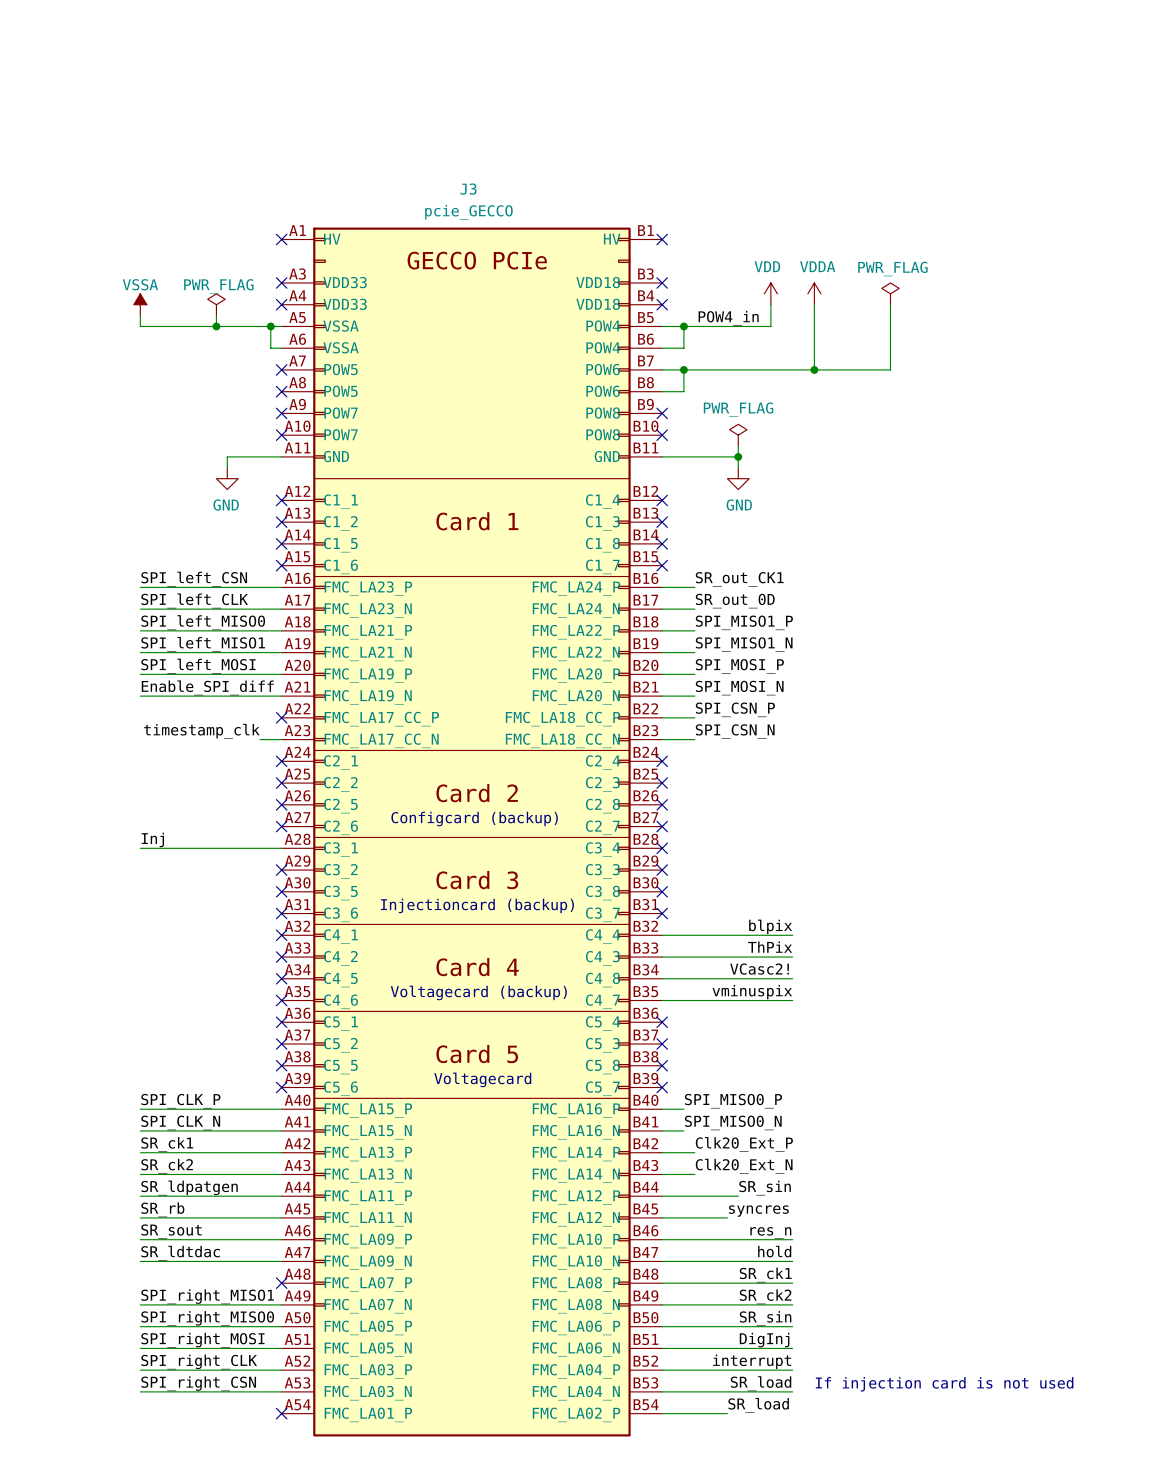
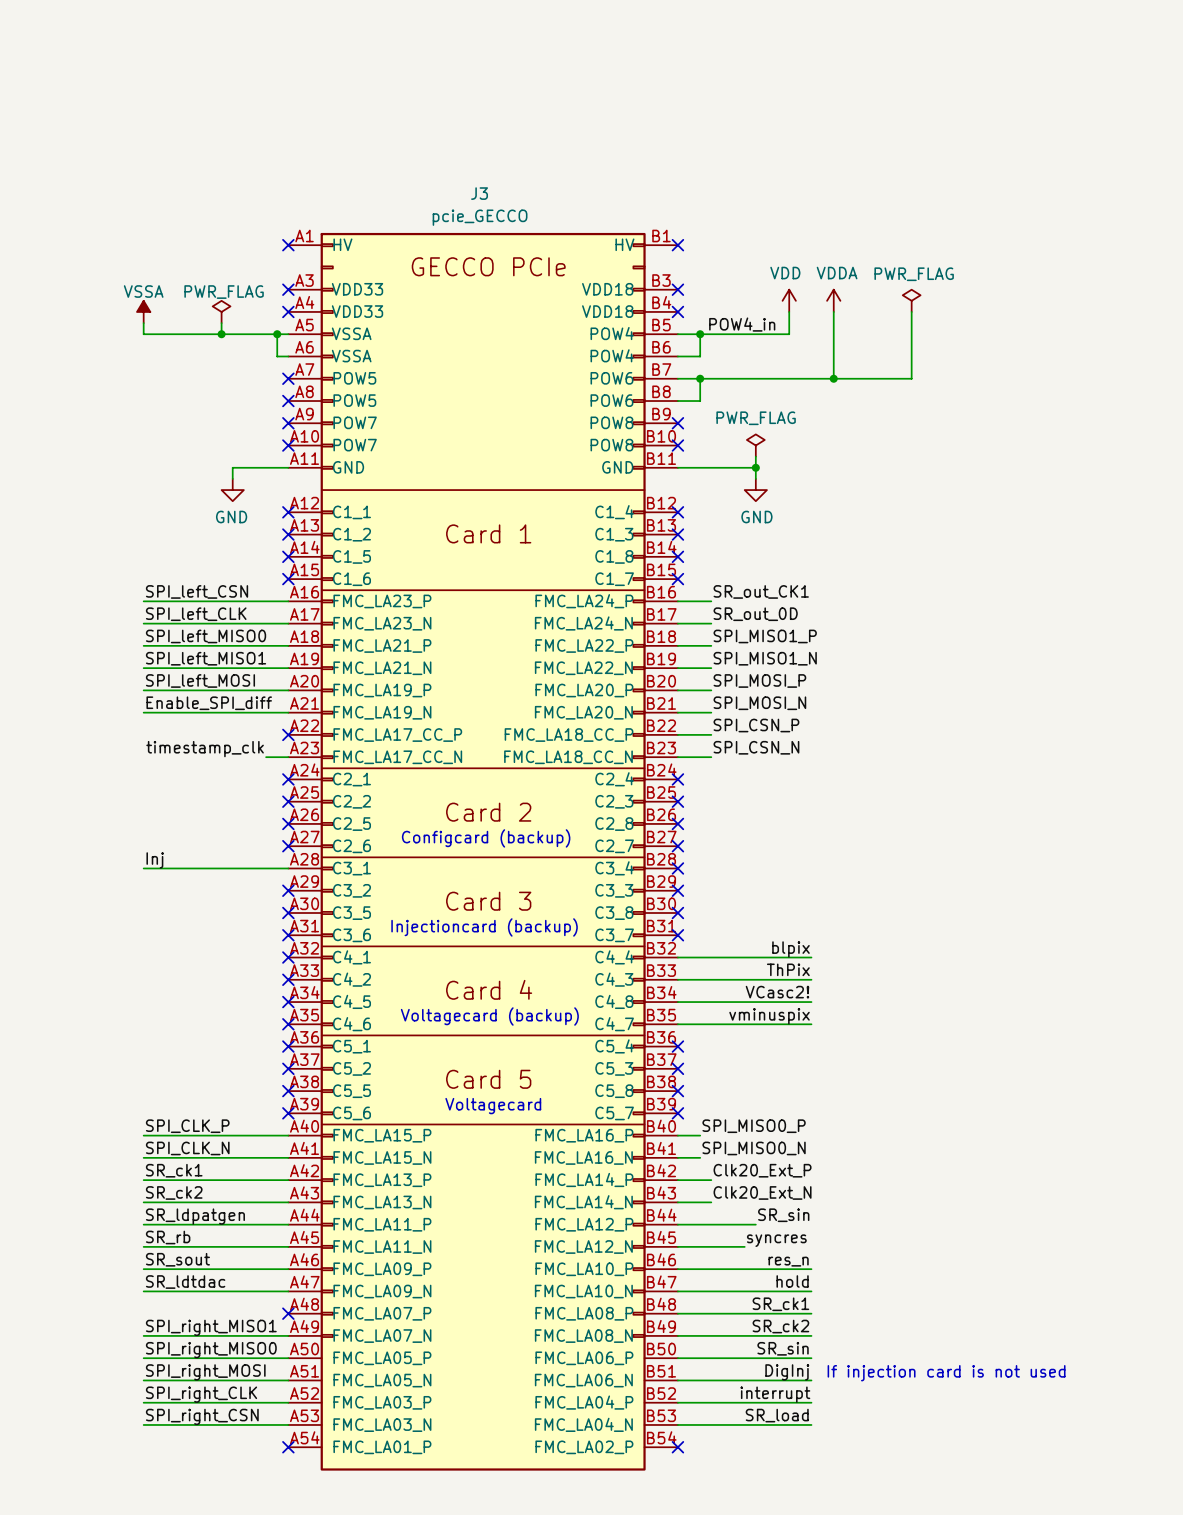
text position: If injection card is not used (944, 1384) -> If injection card is not used (946, 1373)
label: SR_load (758, 1405) -> none
wire: (662, 1413) (727, 1413) -> none
no-connect mark: none -> (677, 1447)

